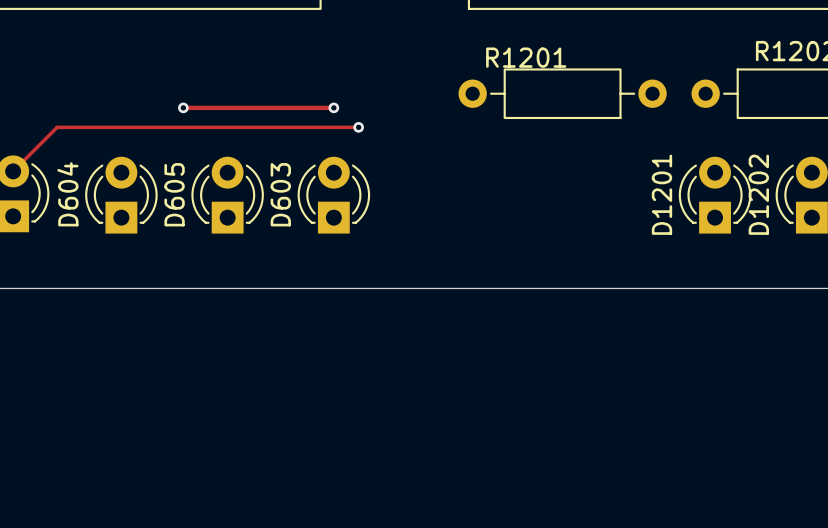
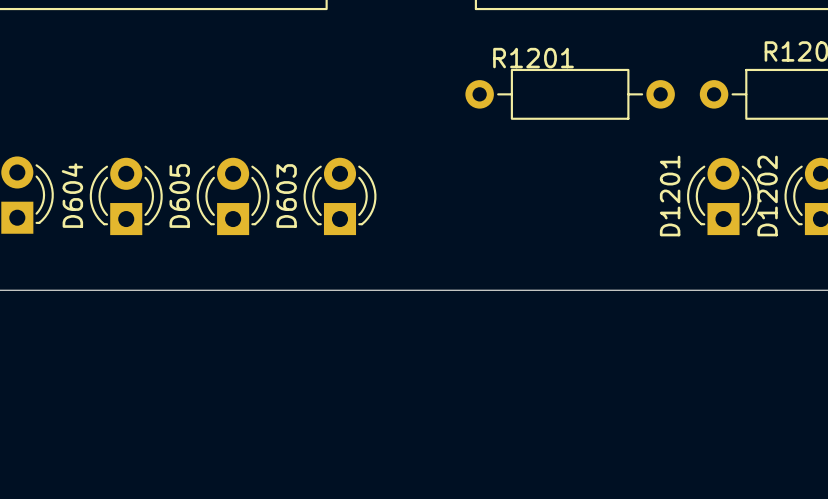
track: (183, 107) (333, 107) -> none
via: (183, 107) -> none
via: (333, 107) -> none
track: (358, 127) (57, 127) (13, 171) -> none
via: (358, 127) -> none

